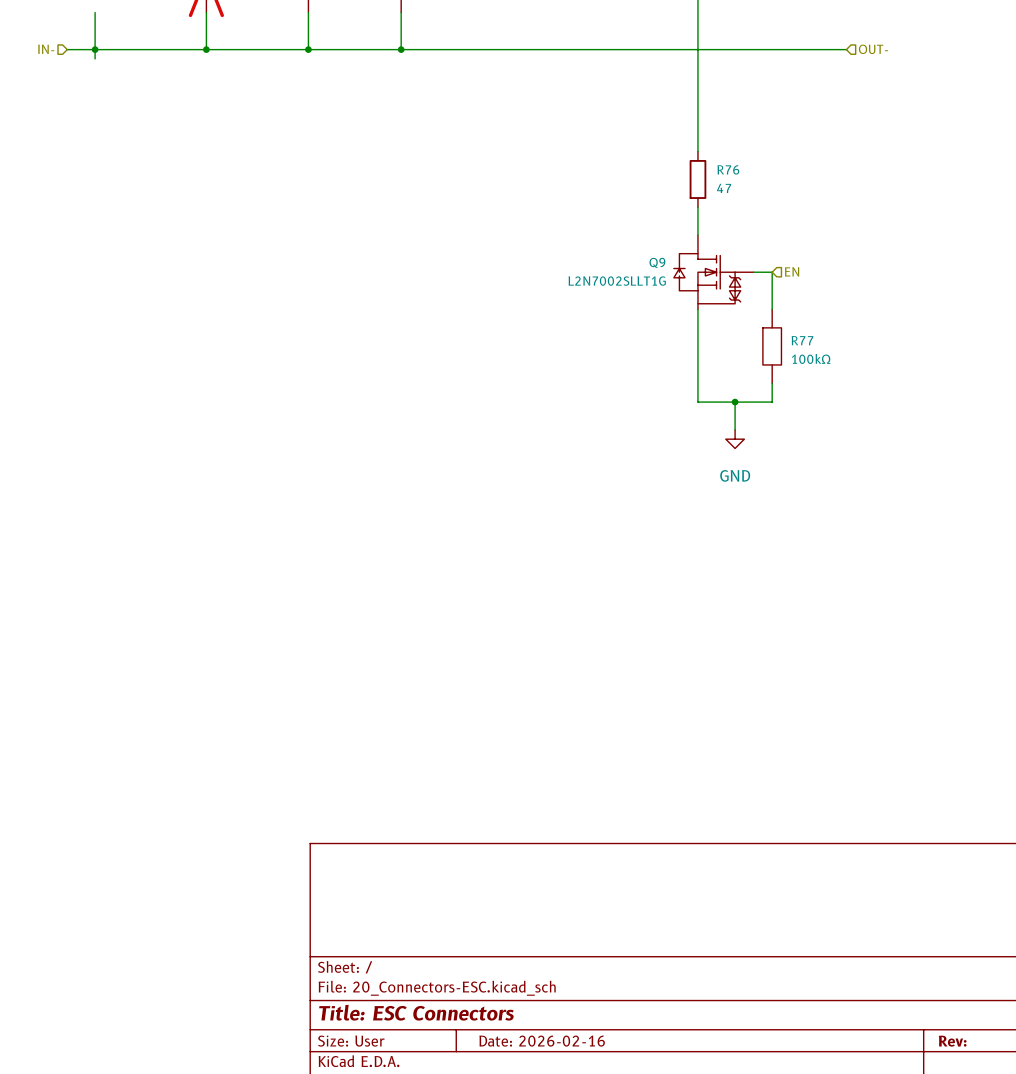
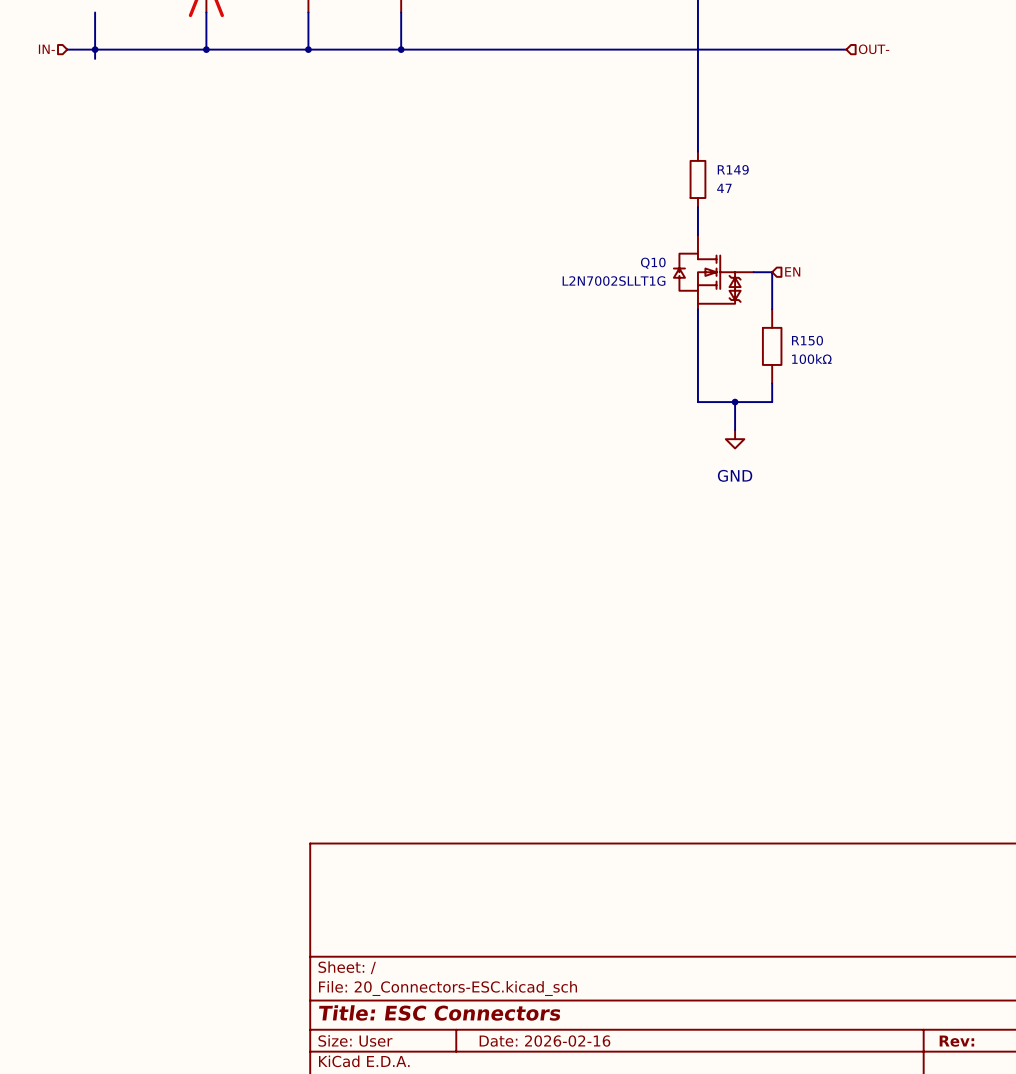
R76 name: R76 (728, 169) -> R149 (733, 169)
Q9 name: Q9 (657, 262) -> Q10 (653, 263)
R77 name: R77 (802, 340) -> R150 (807, 340)

